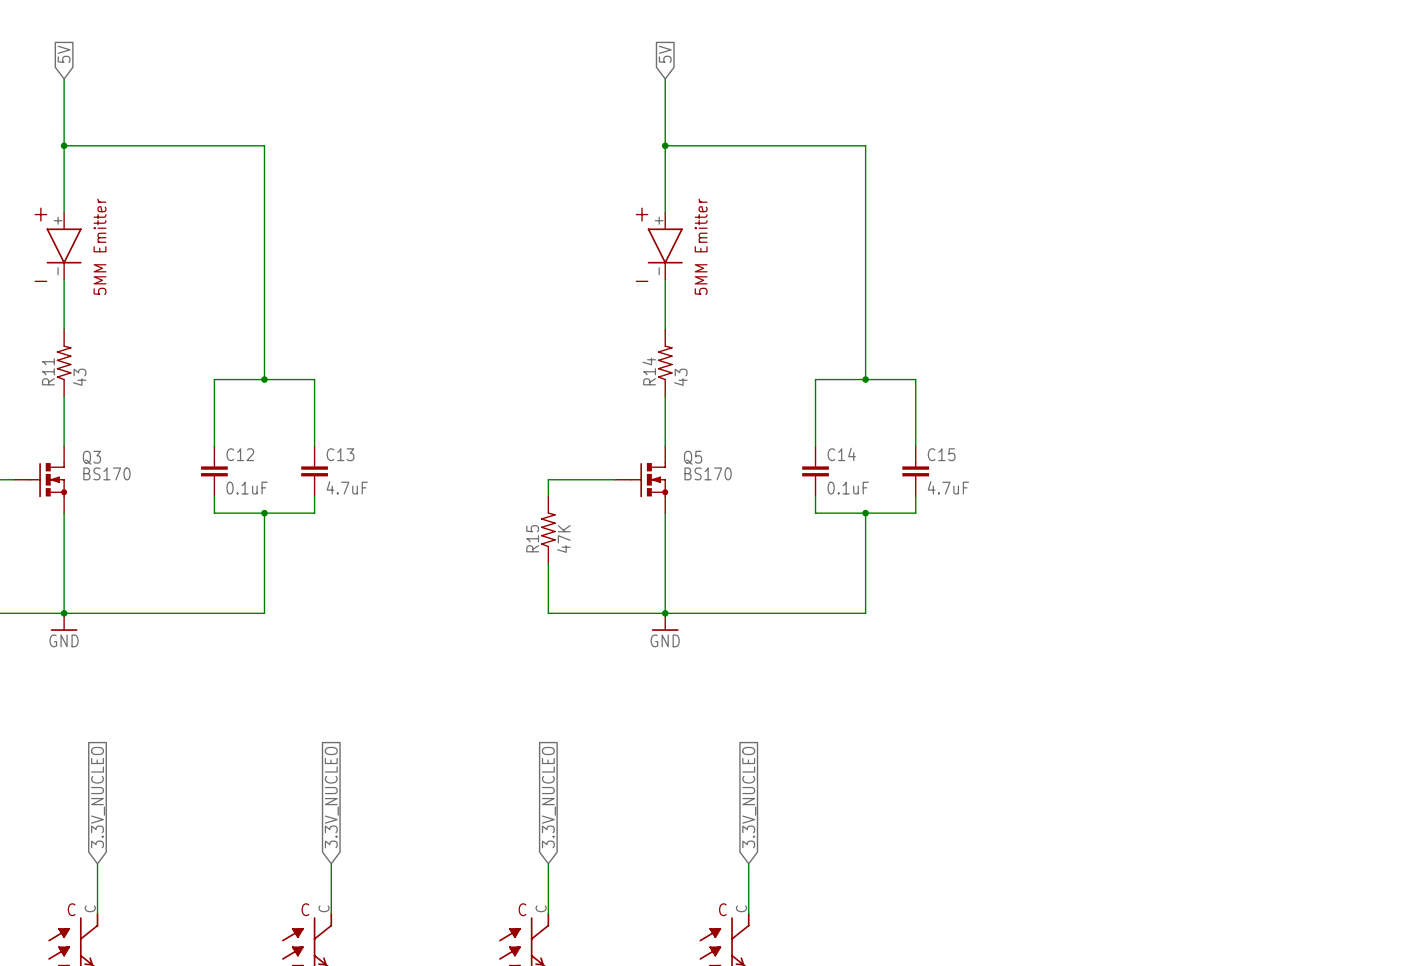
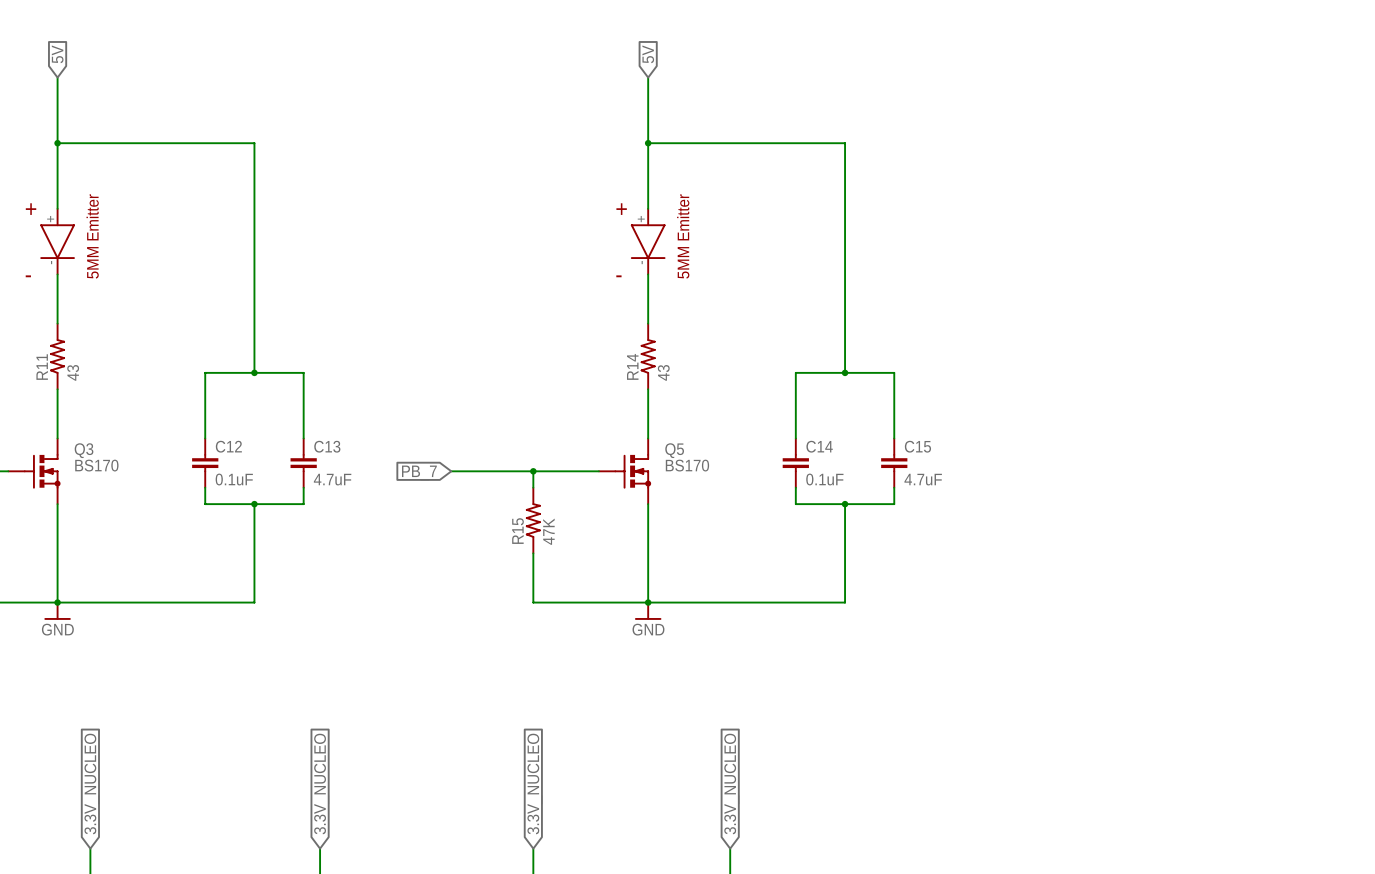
wire: none -> (451, 471) (533, 471)
junction: none -> (533, 471)
global label: none -> PB_7 (419, 472)

